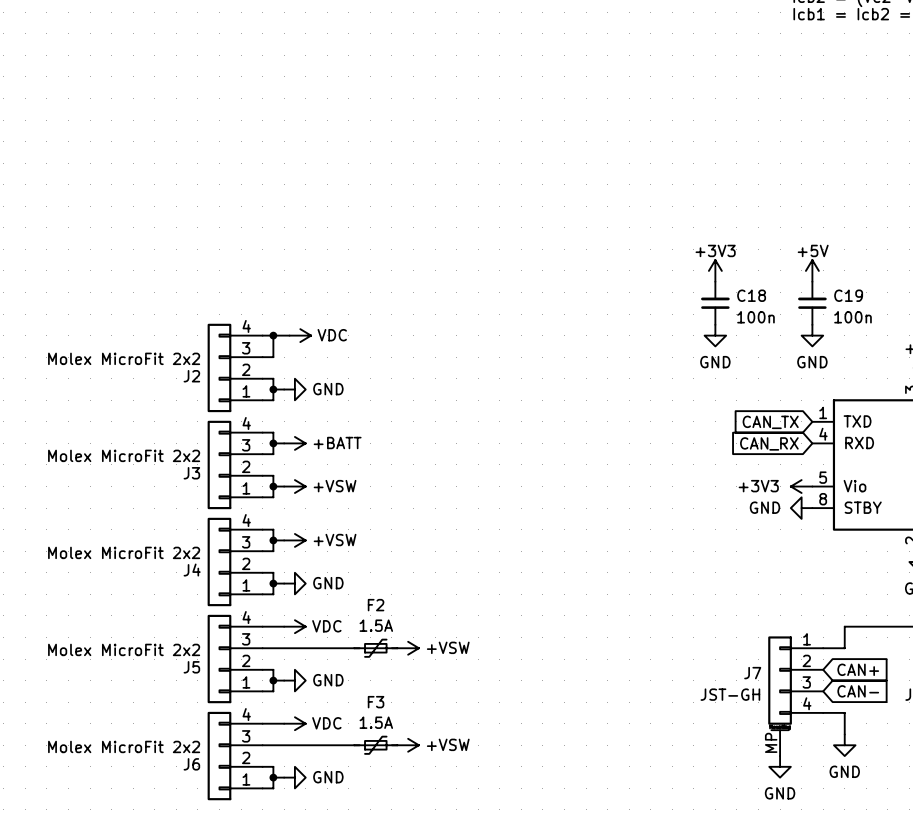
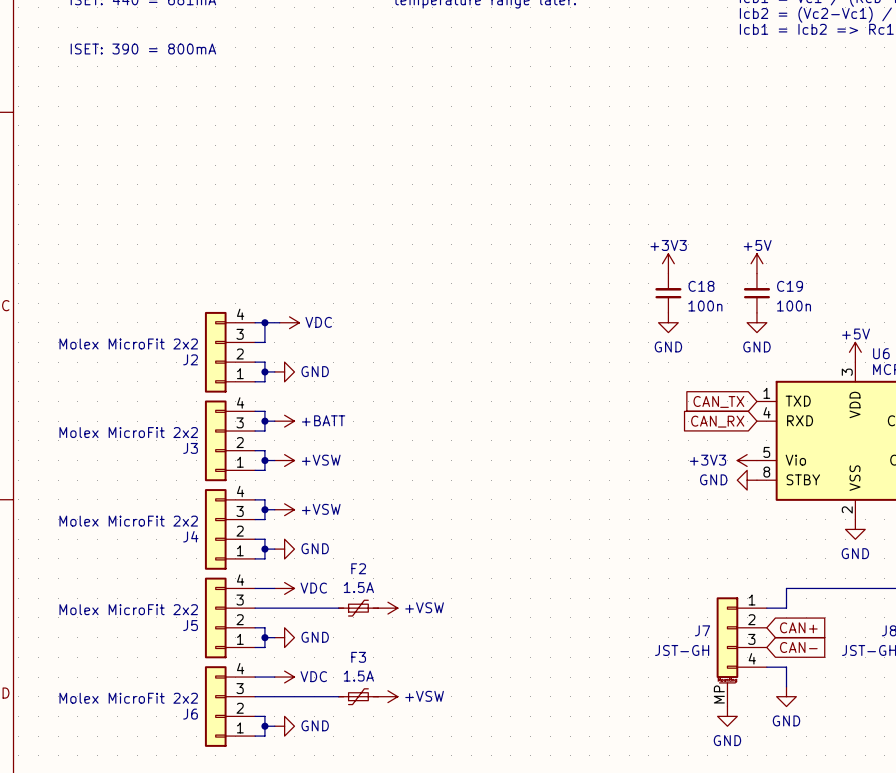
text: none -> ISET: 390 = 800mA (143, 49)

